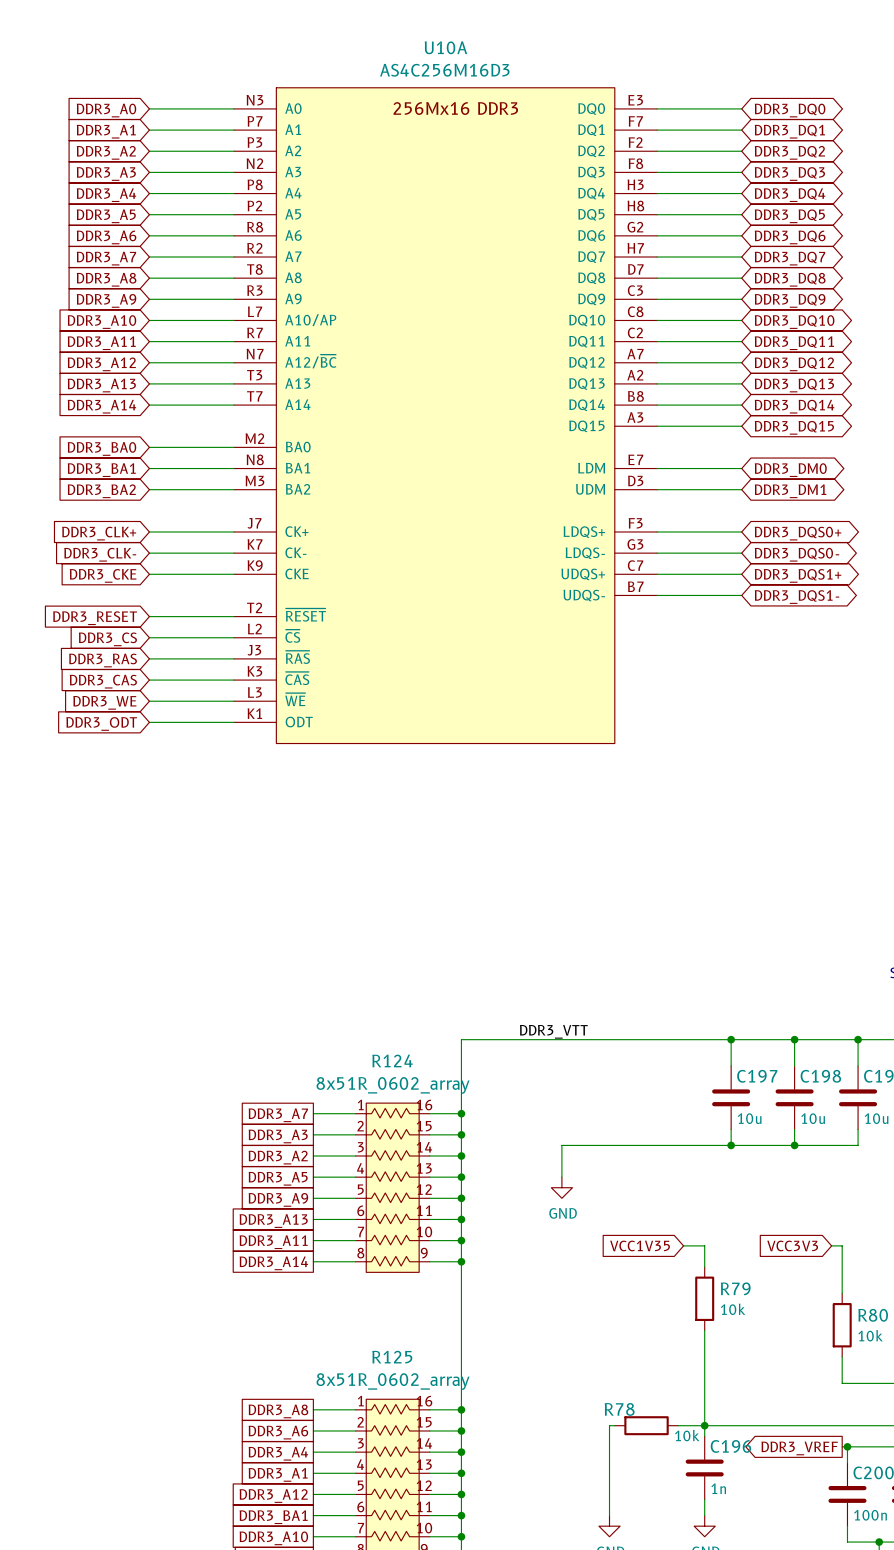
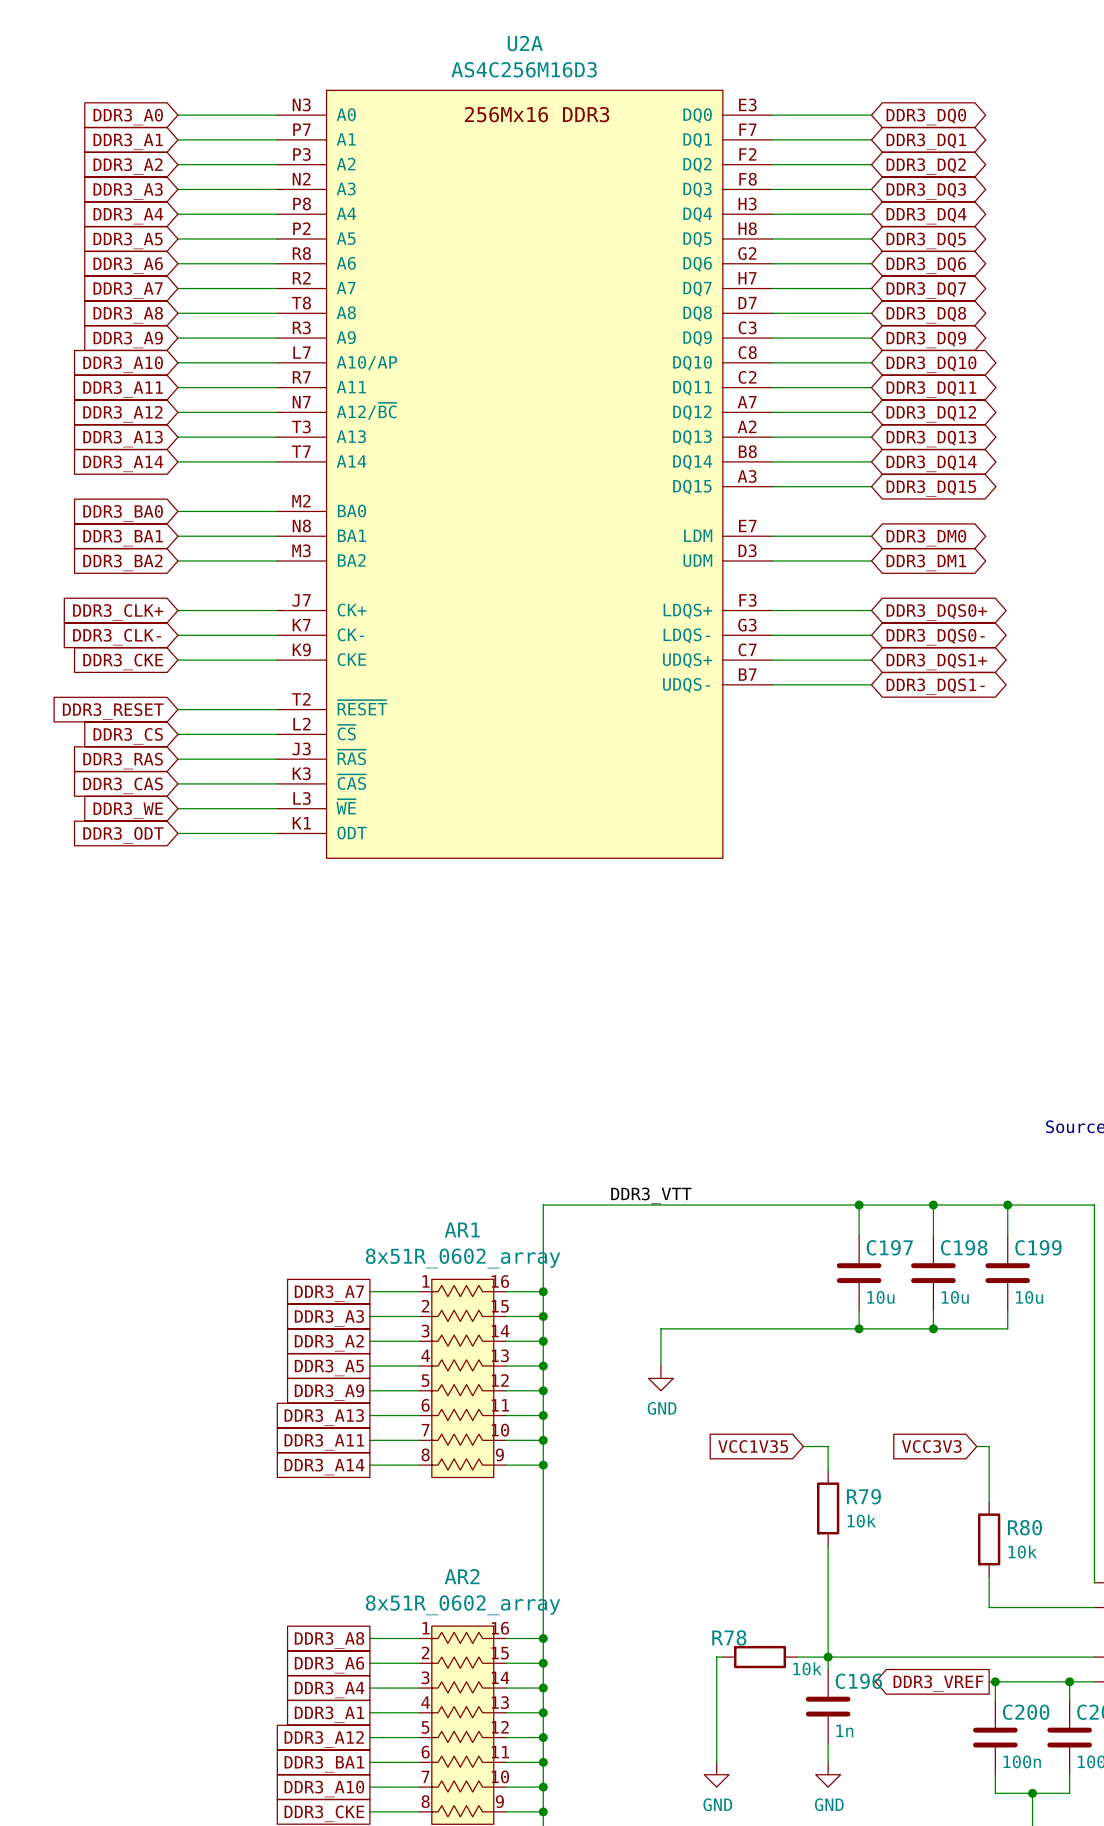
U10A name: U10A (445, 47) -> U2A (525, 43)
R124 name: R124 (392, 1060) -> AR1 (462, 1229)
R125 name: R125 (392, 1357) -> AR2 (462, 1576)

